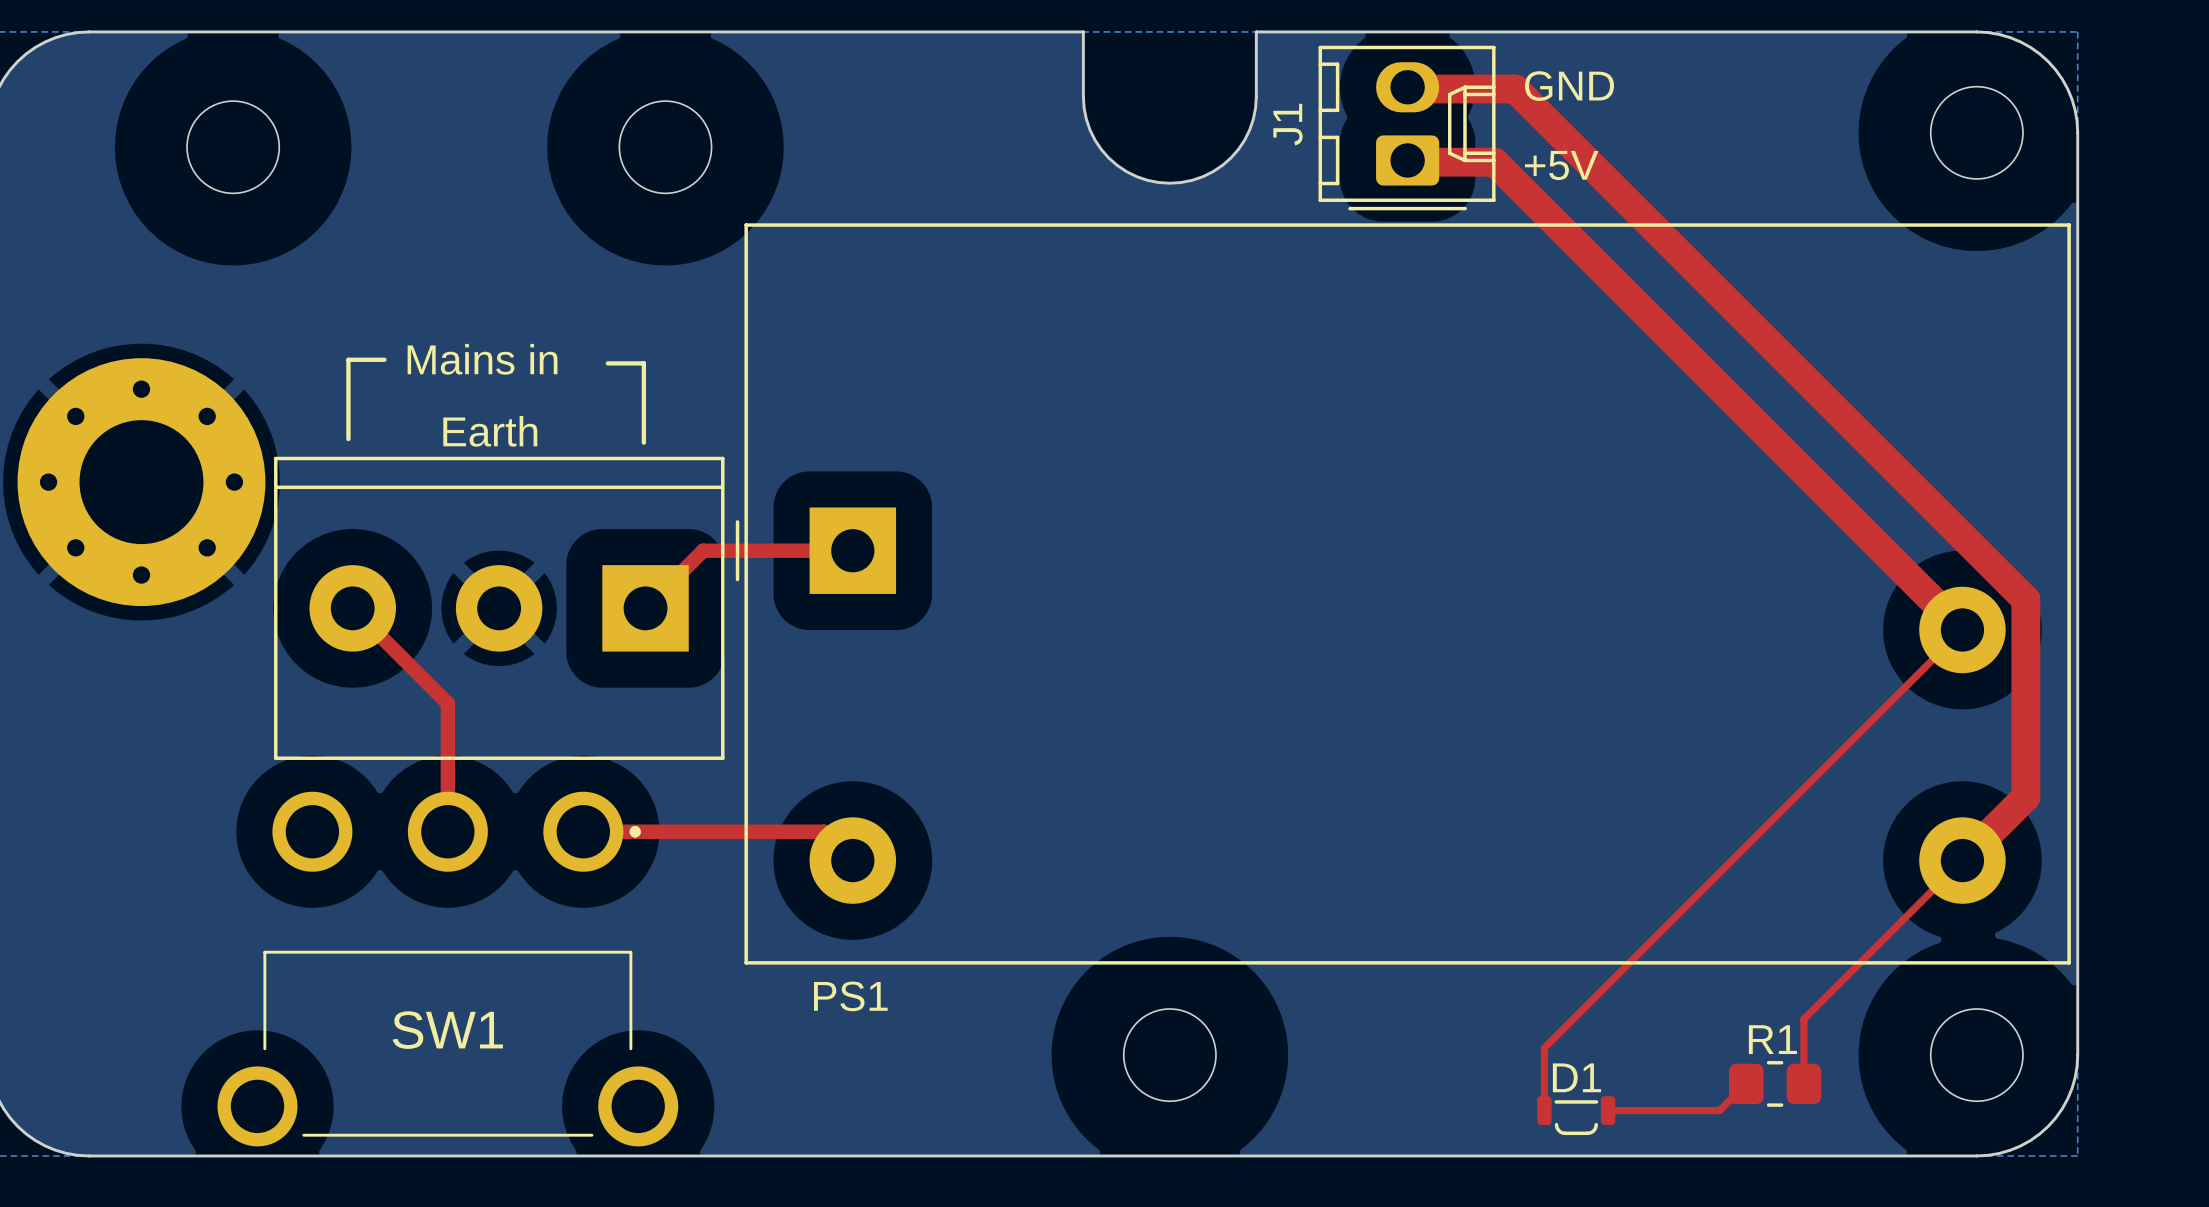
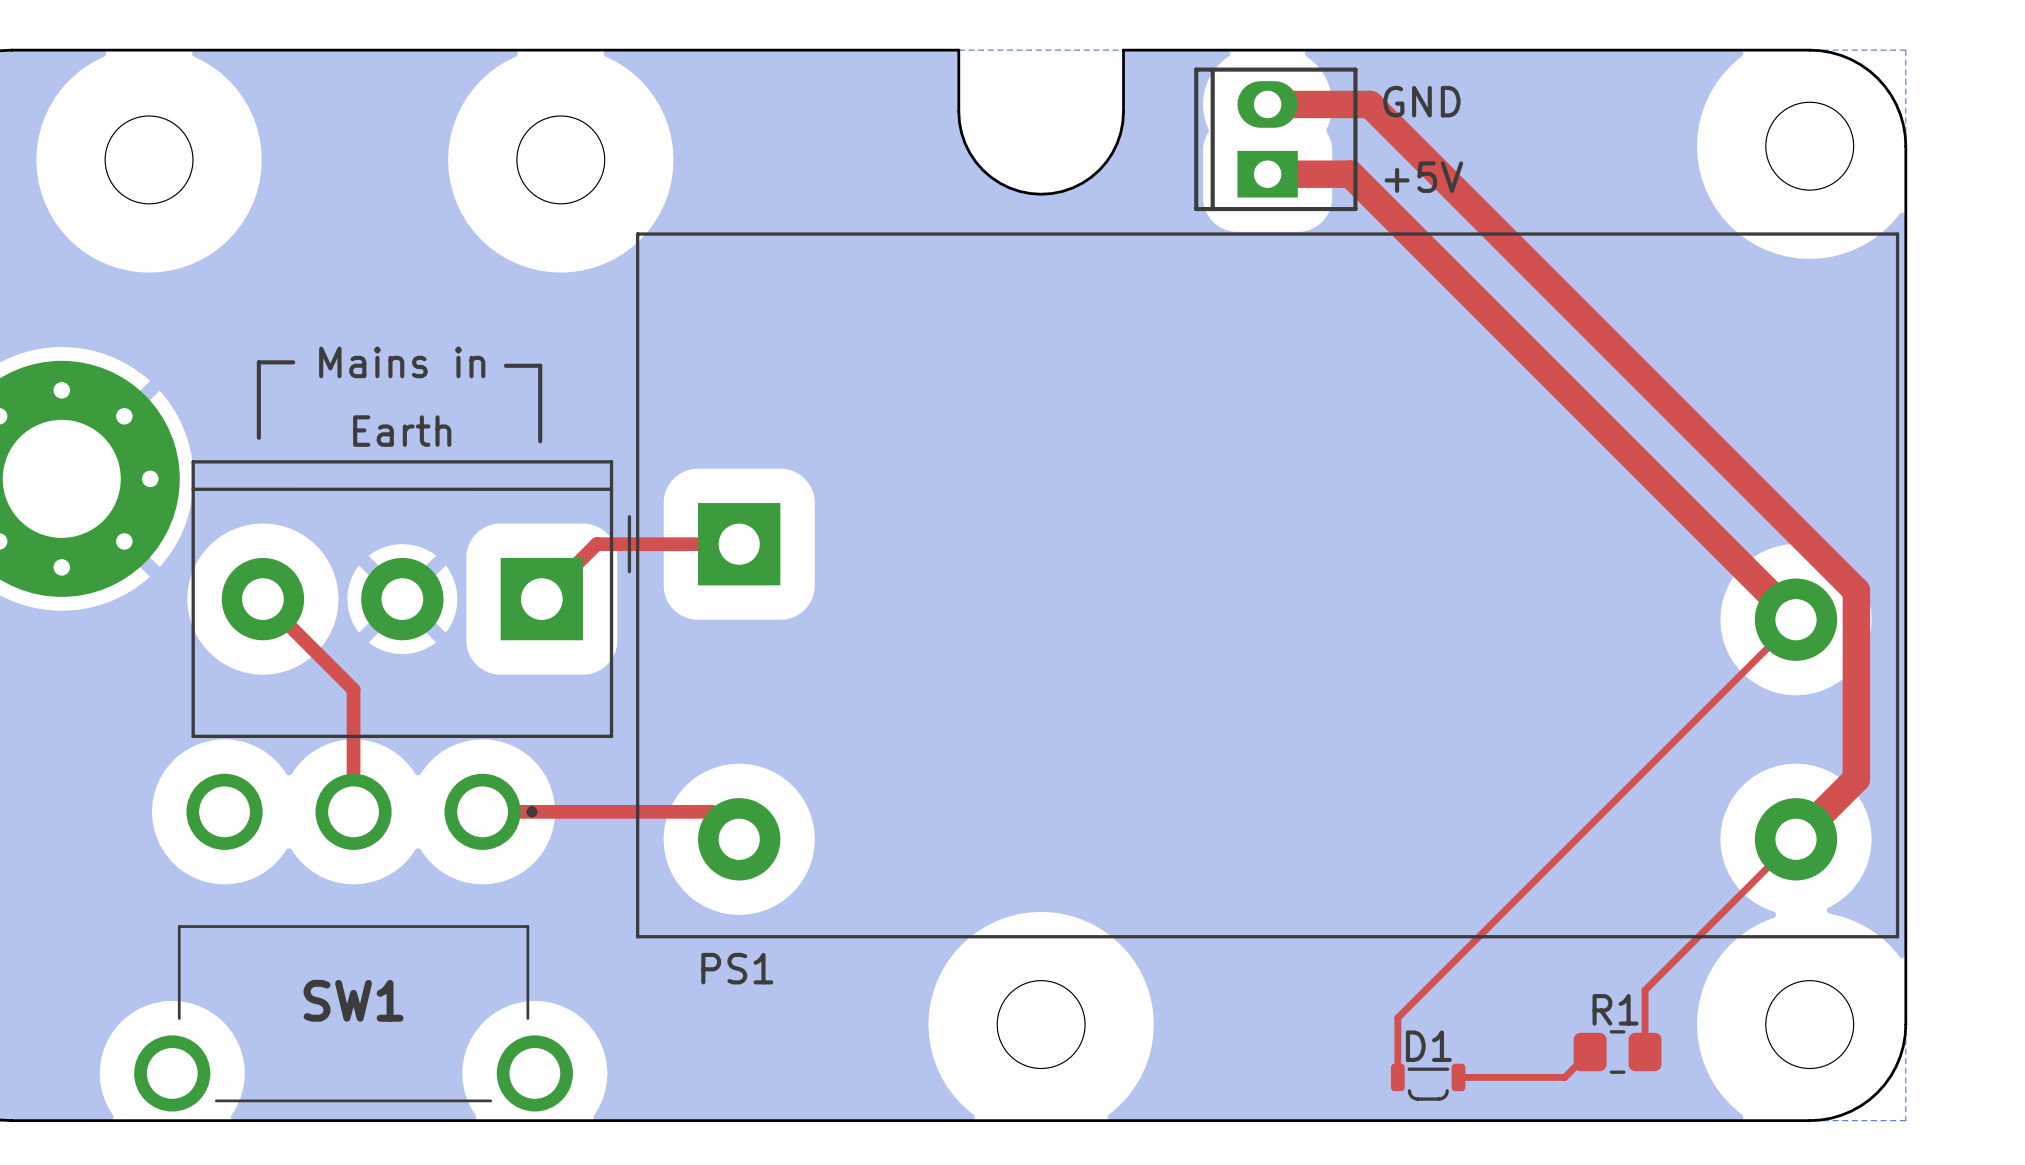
part: none -> (1275, 139)
J1: (1407, 128) -> none
part footprint: [274, 456, 725, 760] -> [191, 460, 614, 739]

